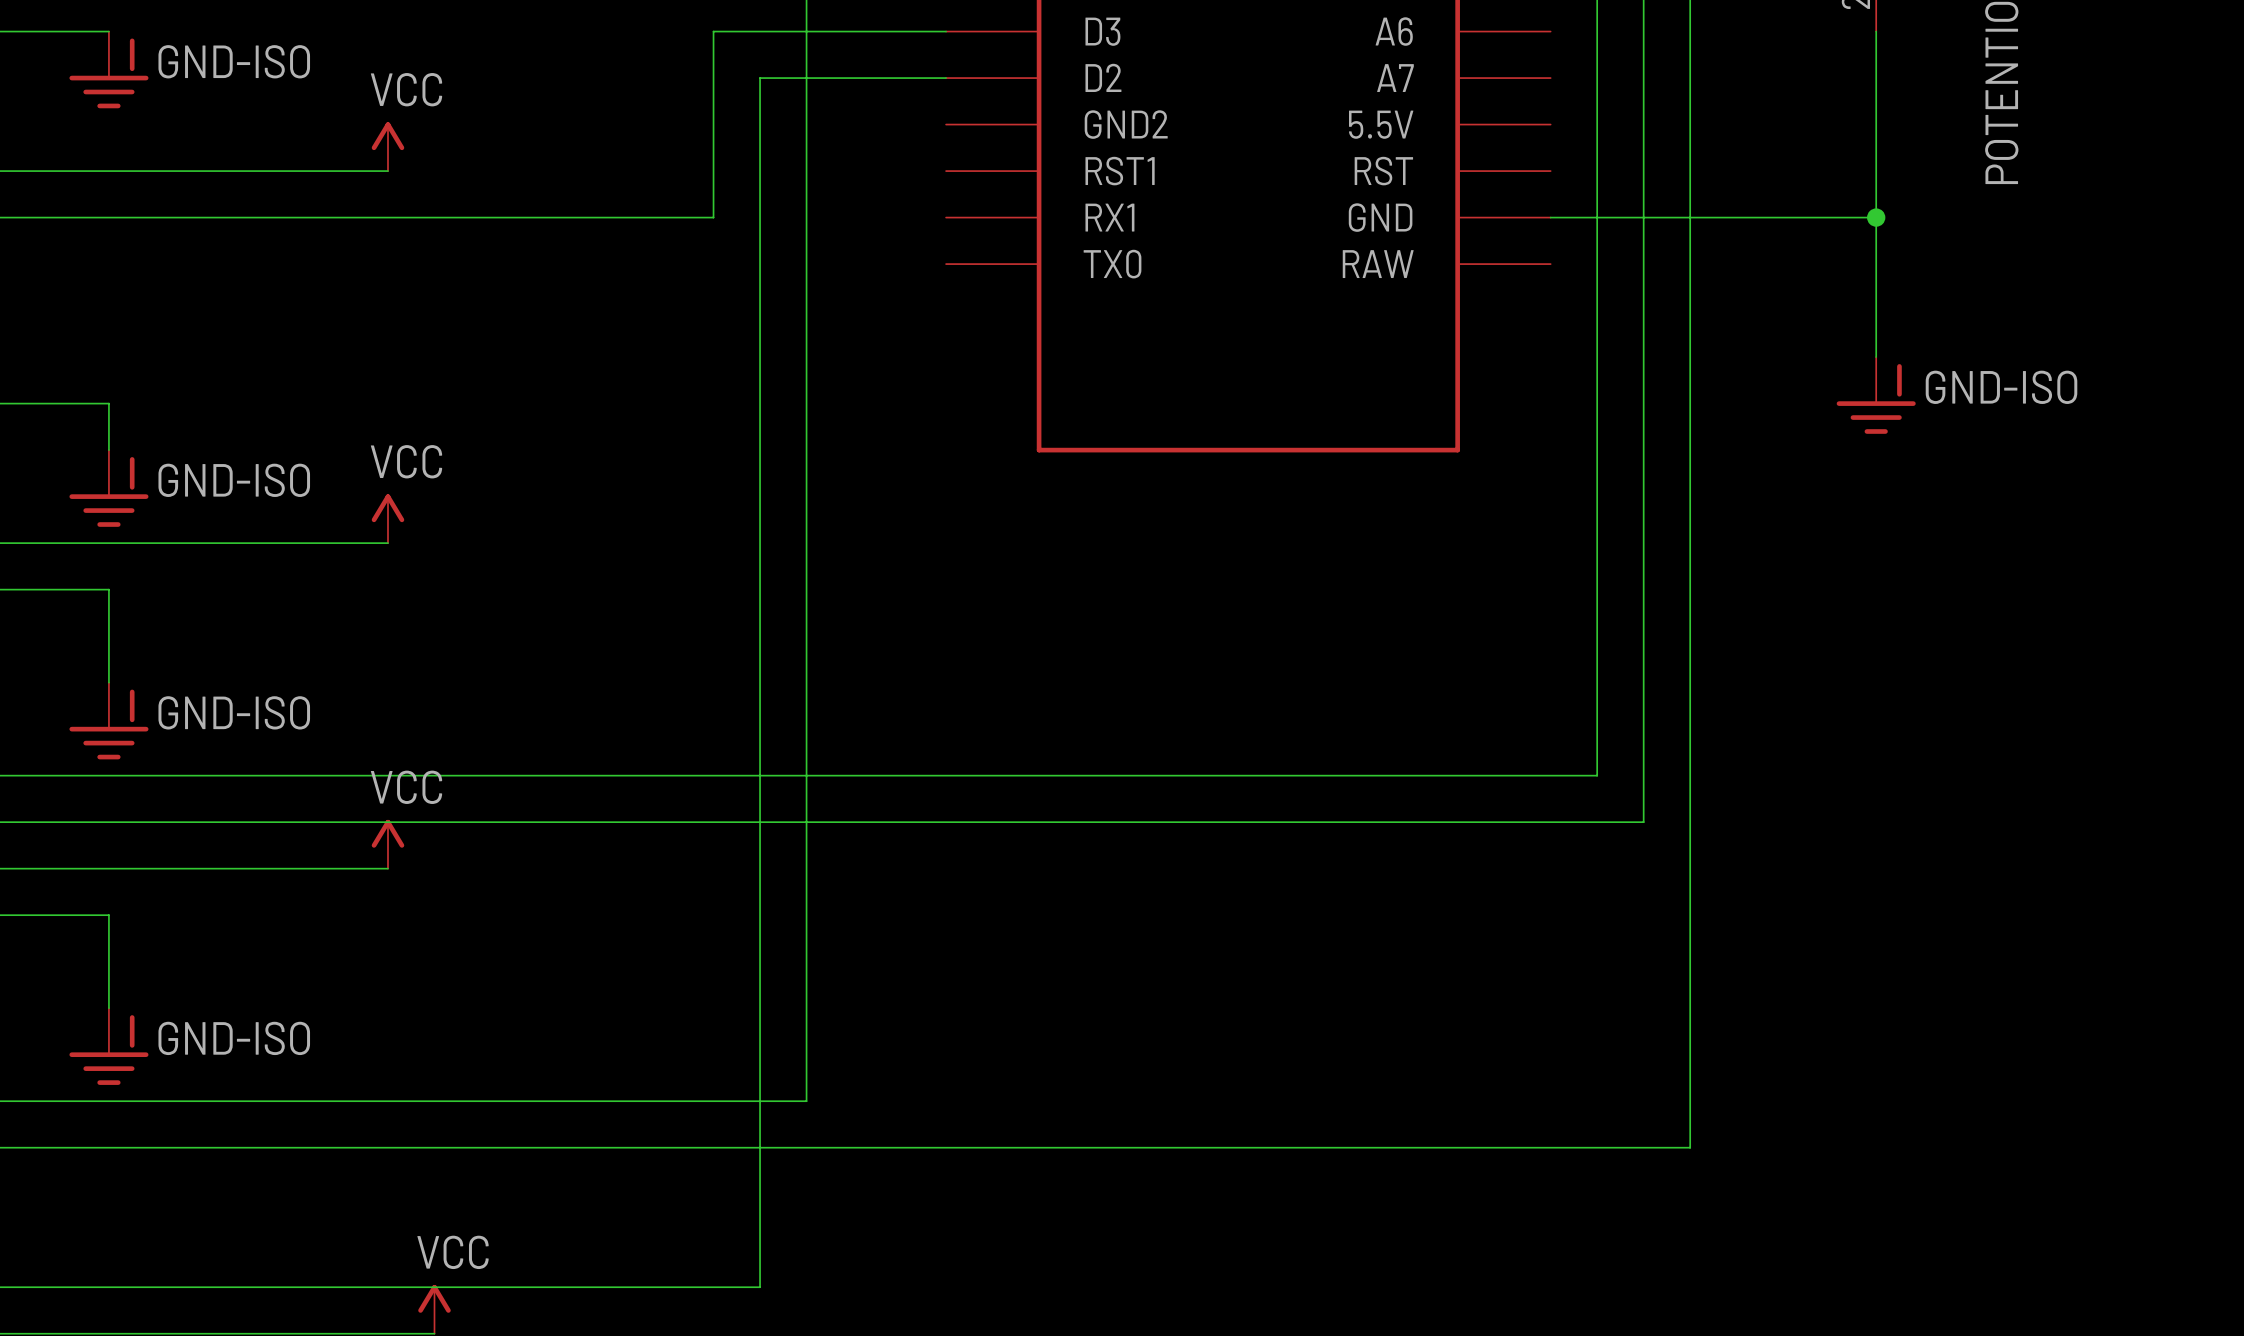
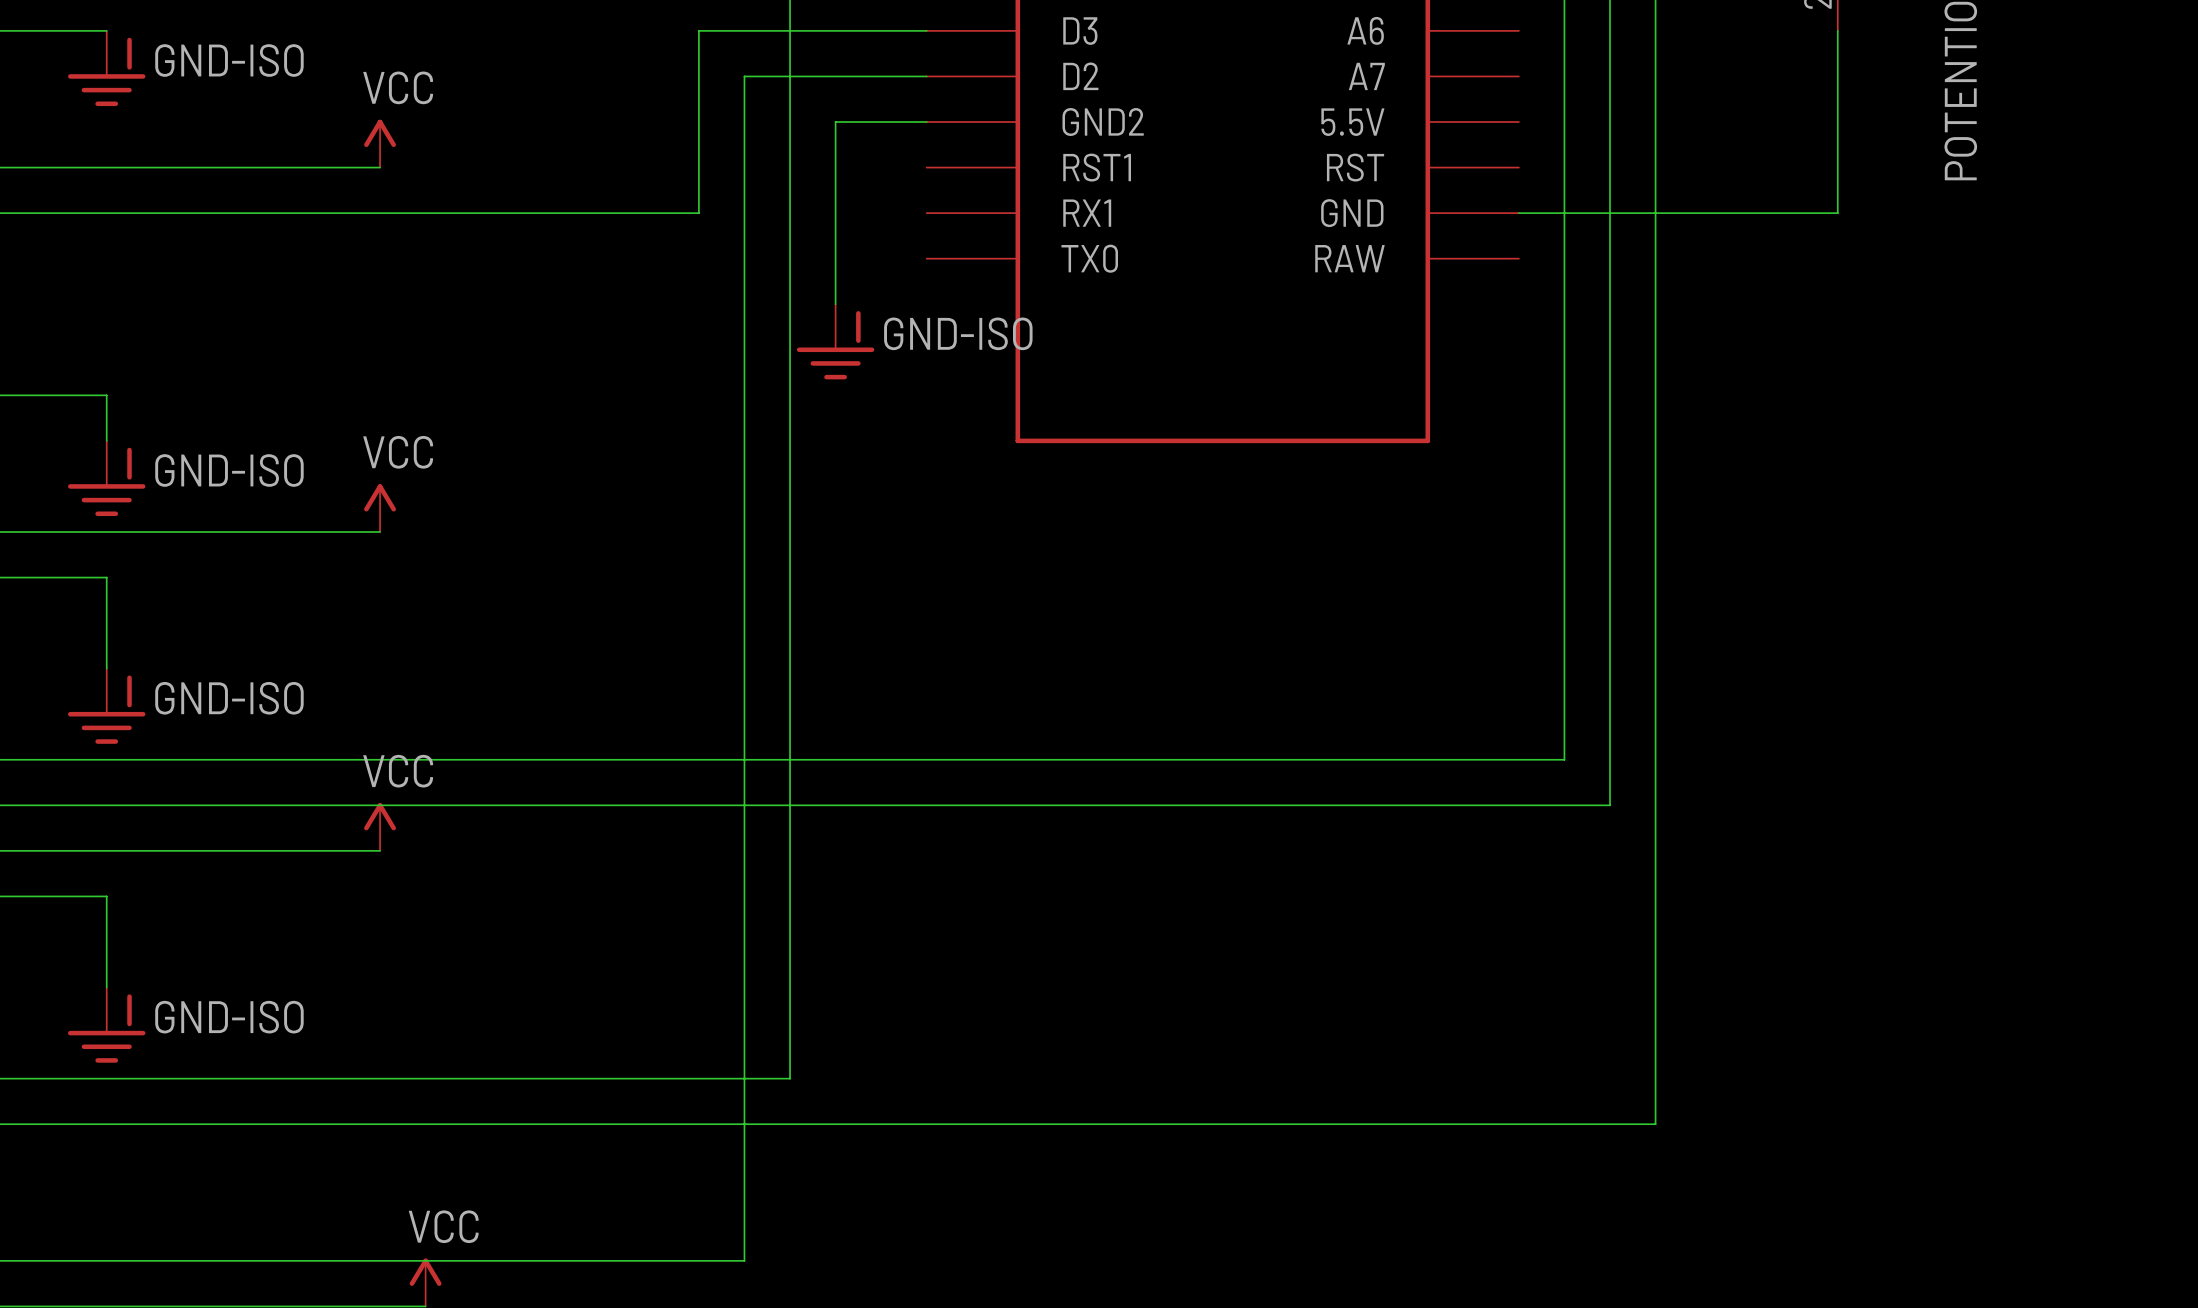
wire: none -> (926, 122) (835, 122) (835, 304)
wire: (1876, 217) (1876, 357) -> none
junction: (1876, 217) -> none
power symbol: none -> GND-ISO (835, 341)
power symbol: GND-ISO (1876, 395) -> none

